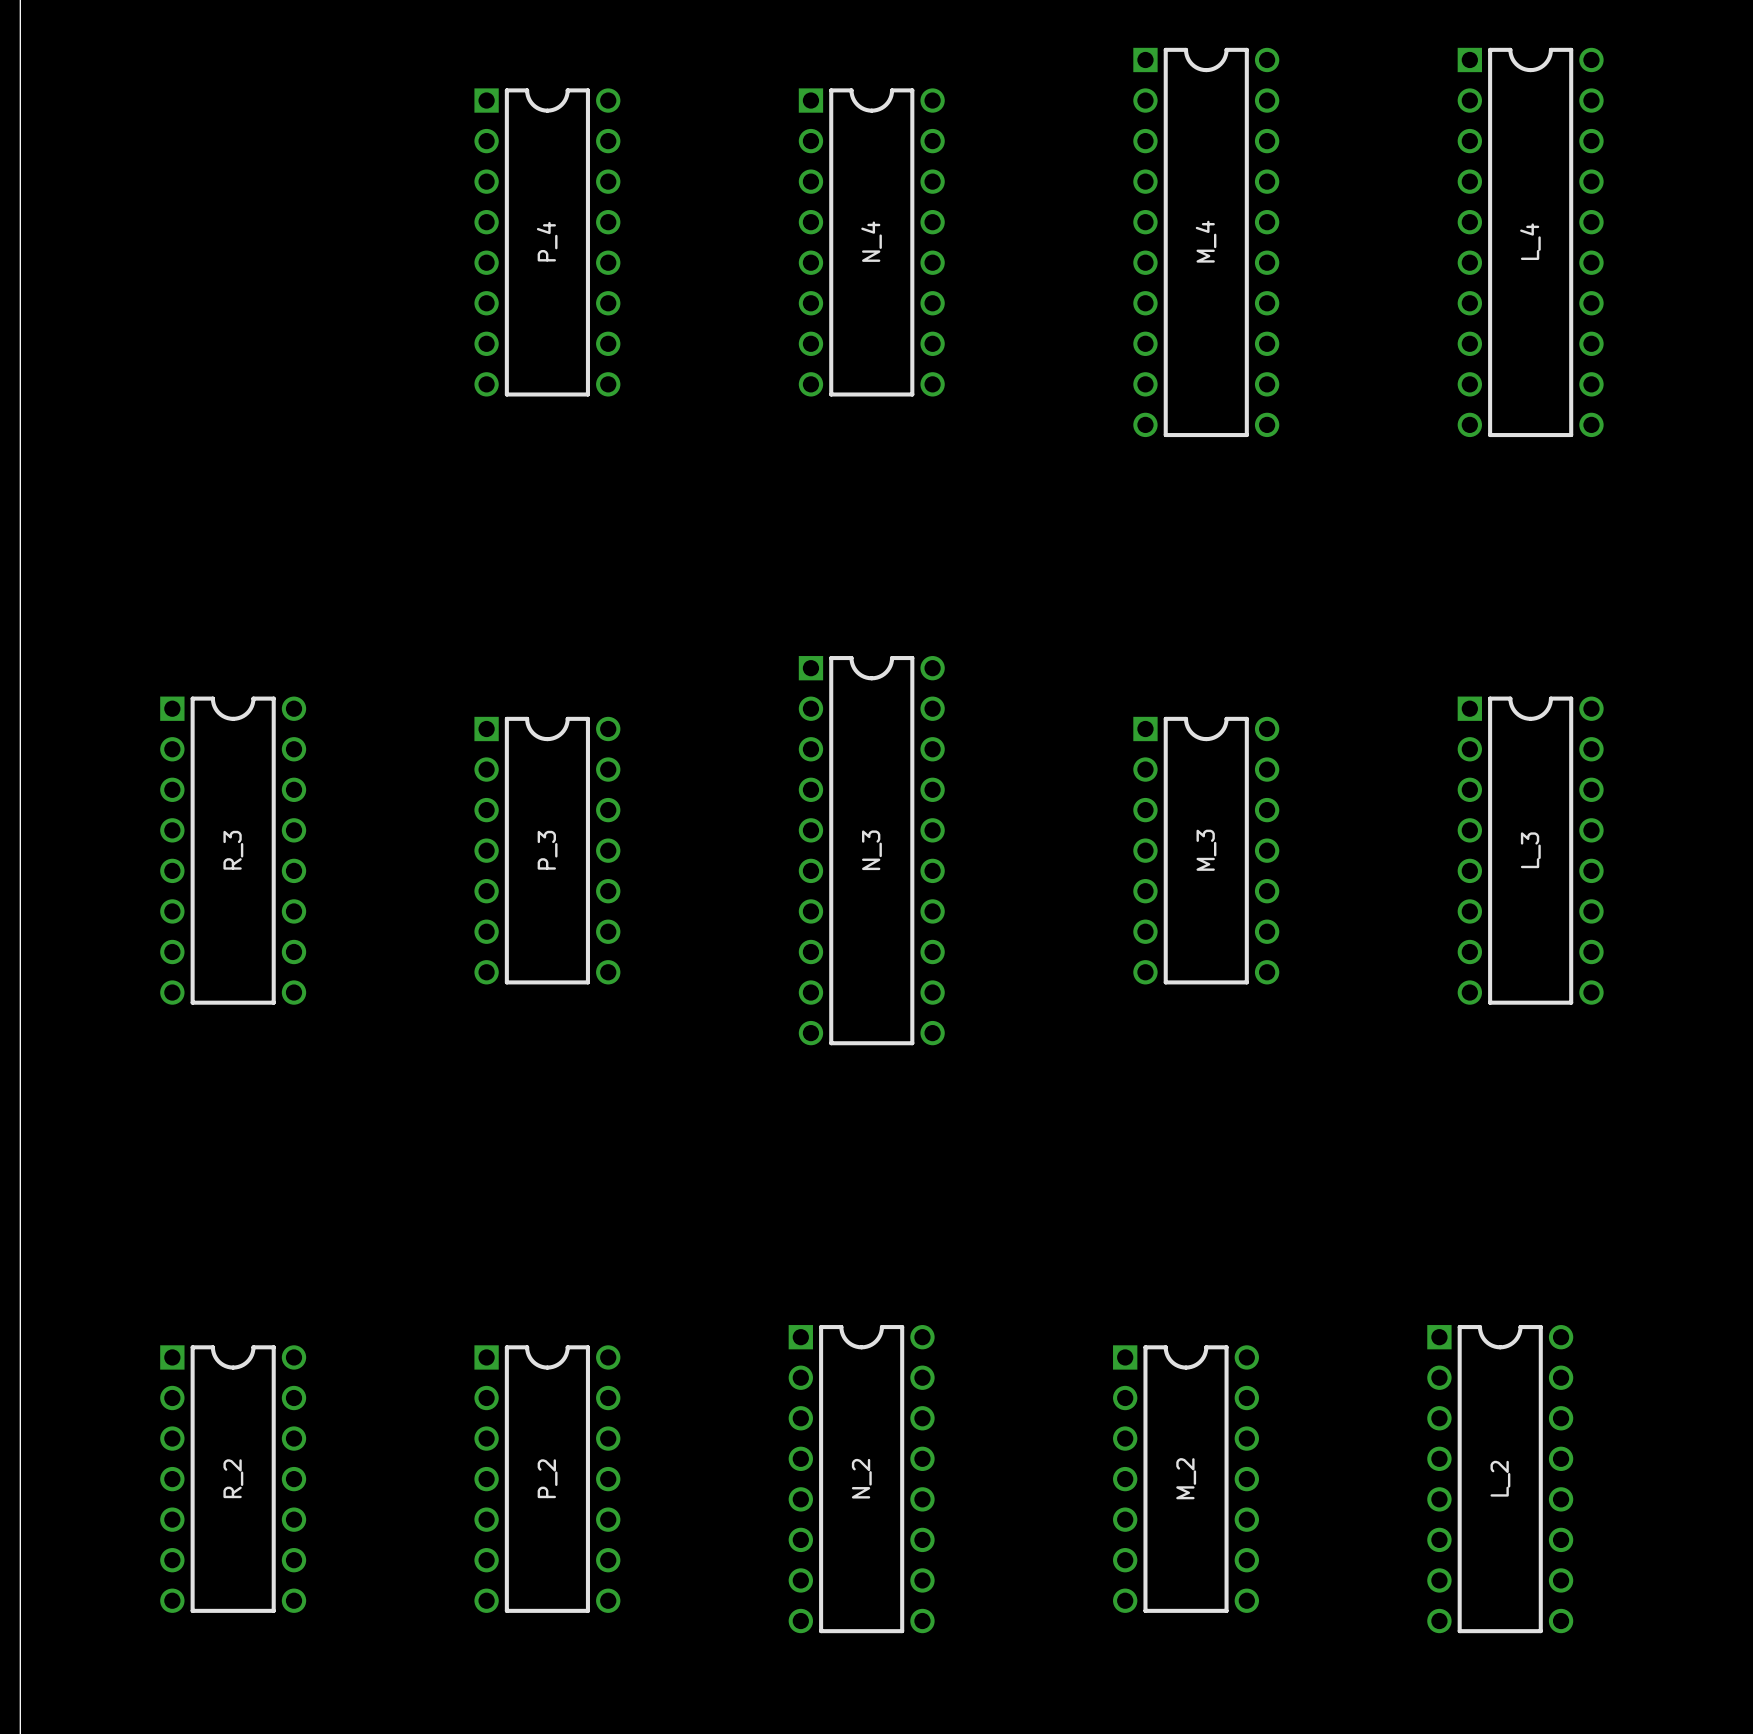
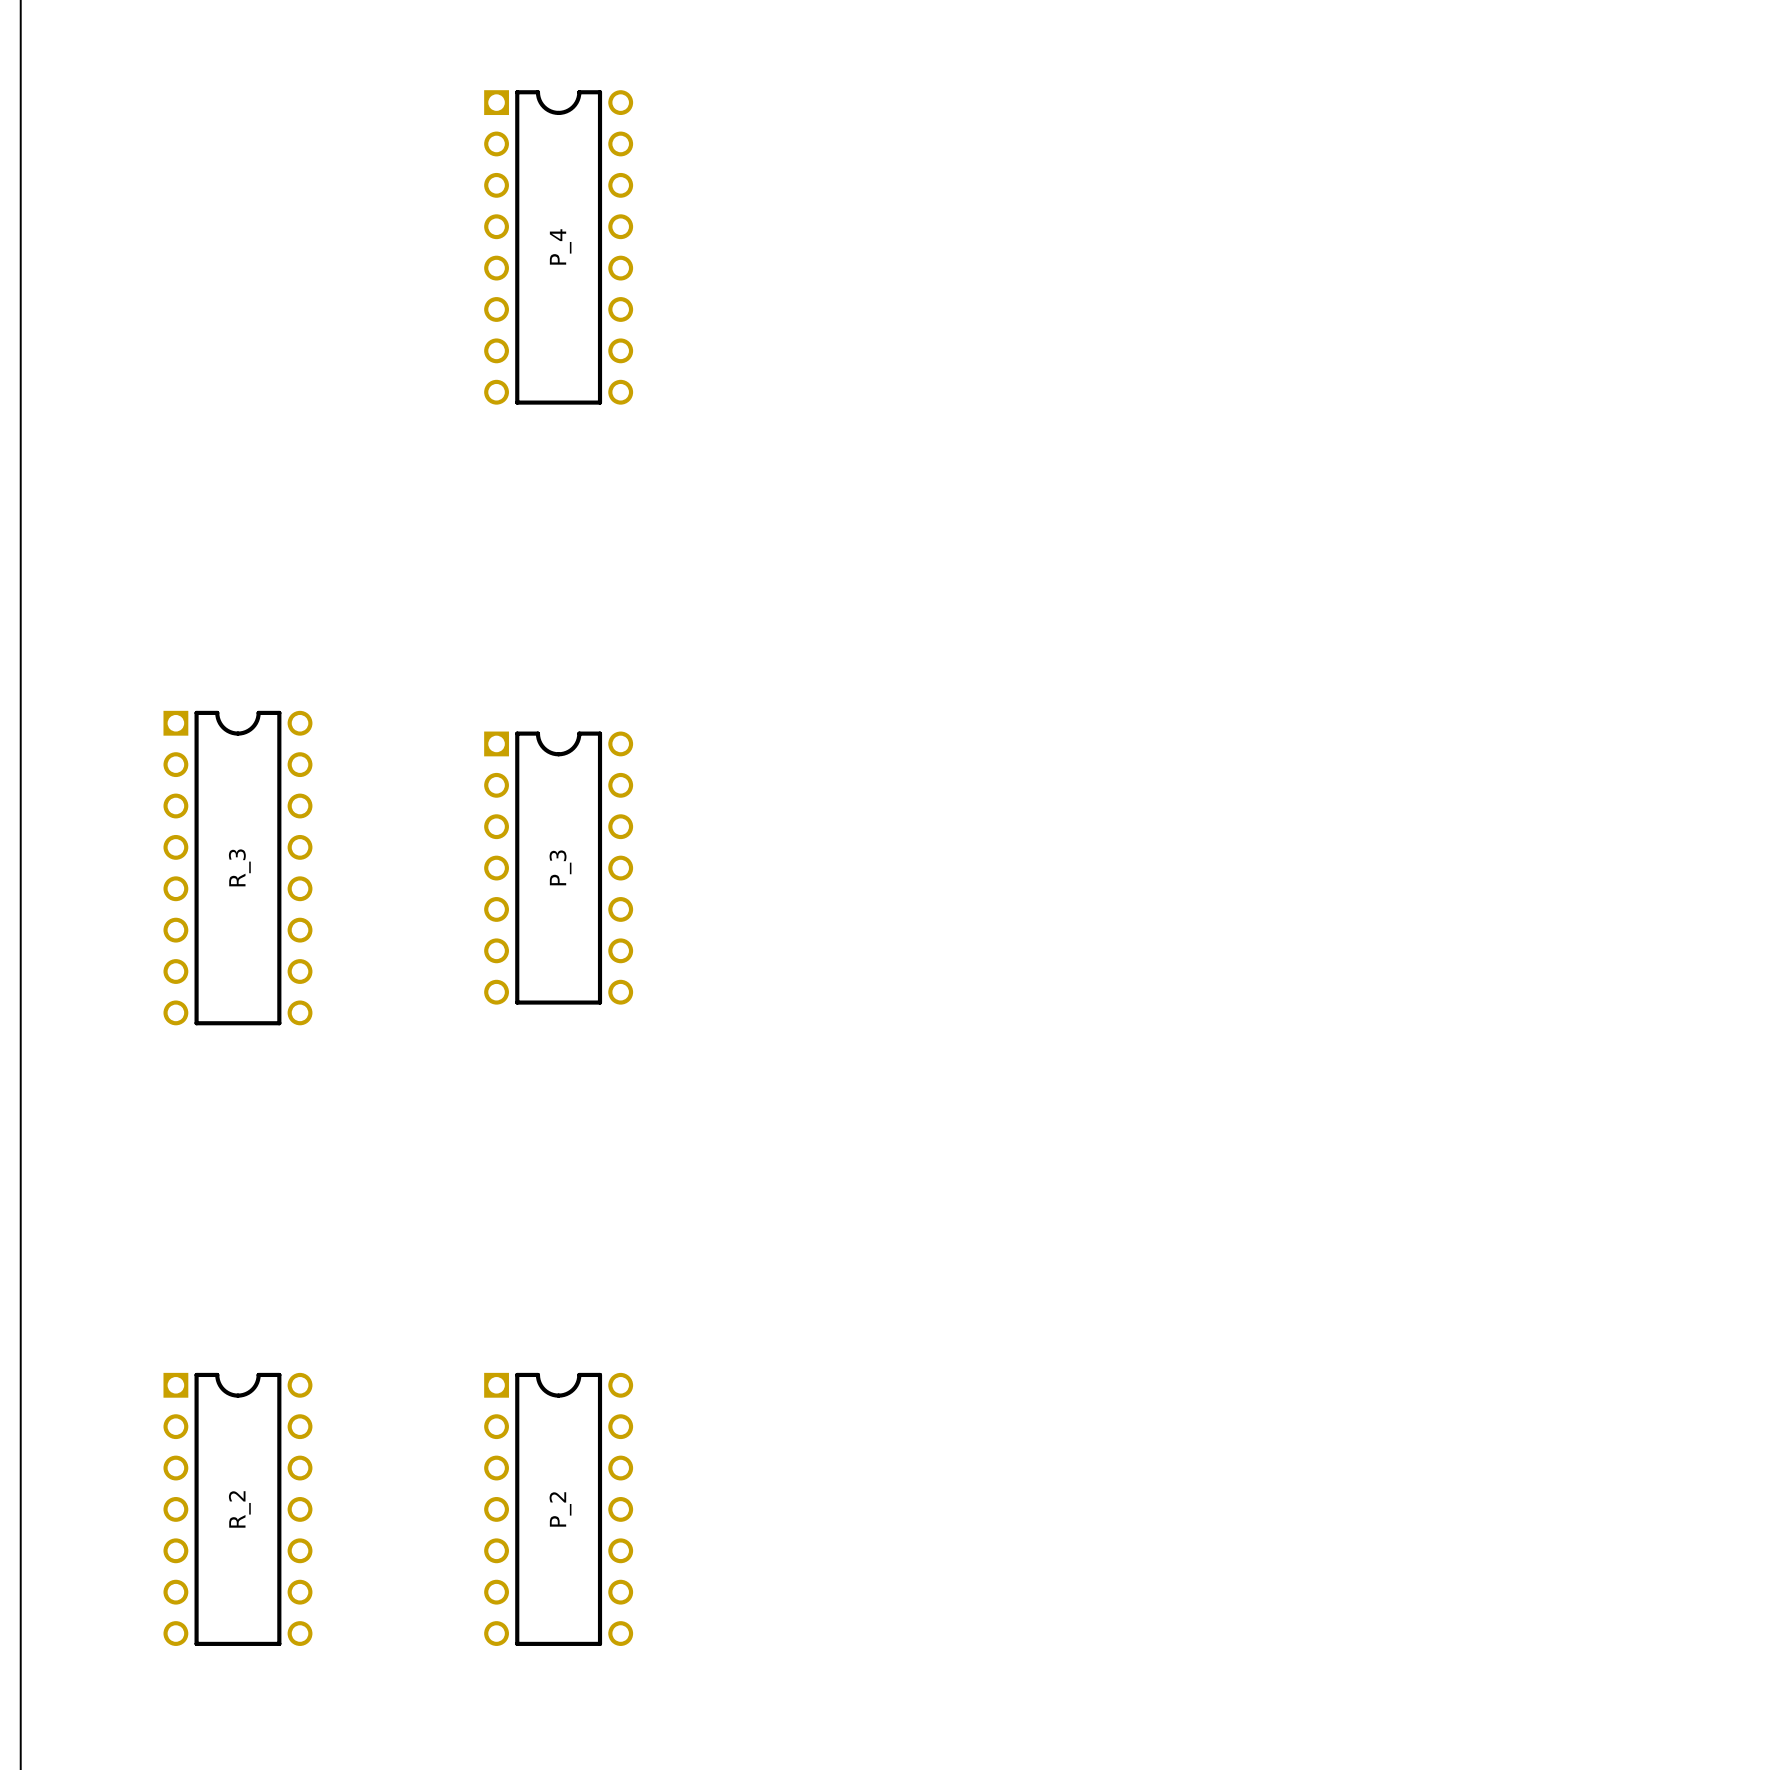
N_4: (871, 242) -> none
M_4: (1206, 242) -> none
L_4: (1530, 242) -> none
N_3: (871, 850) -> none
M_3: (1206, 850) -> none
L_3: (1530, 850) -> none
N_2: (861, 1479) -> none
M_2: (1186, 1479) -> none
L_2: (1500, 1479) -> none

